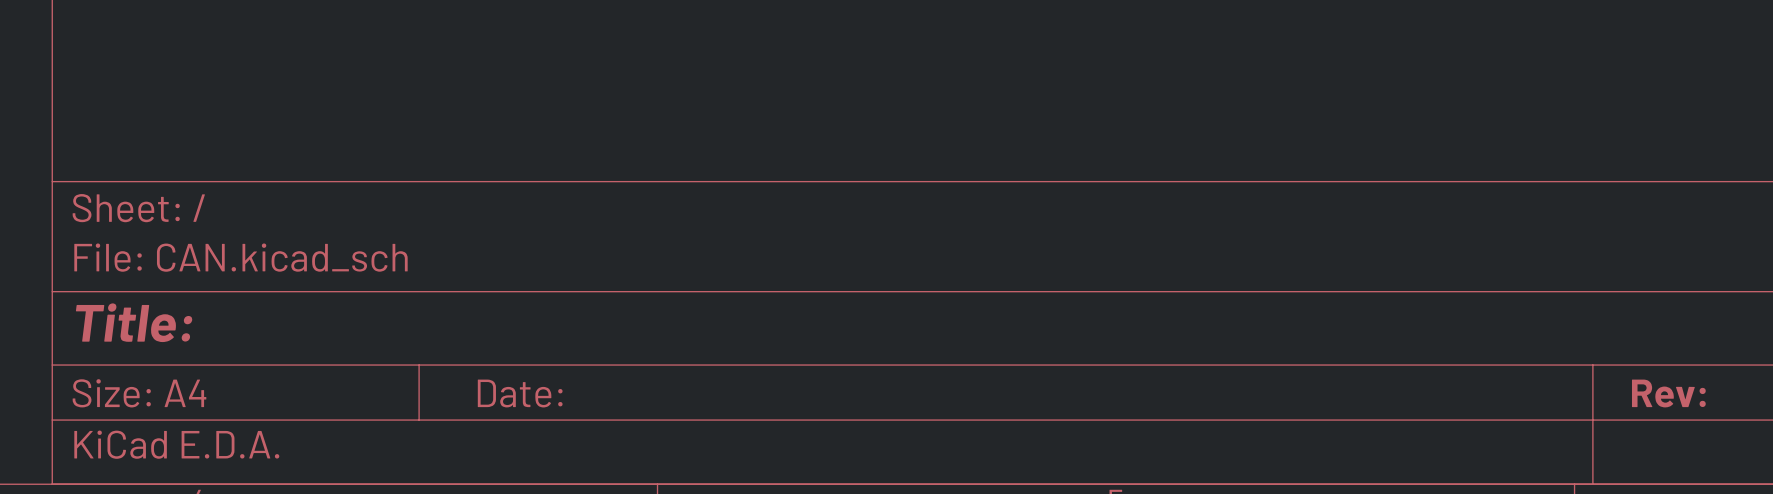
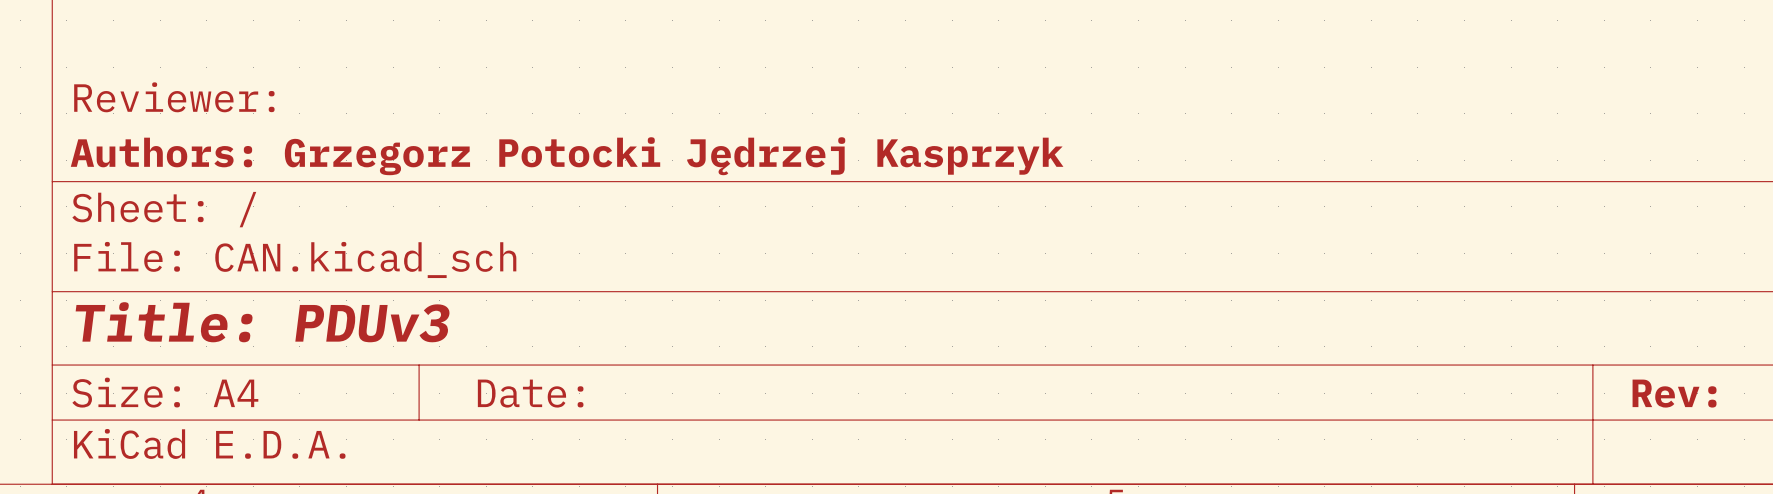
title block: none -> Reviewer: (174, 97)
title block: none -> Authors: Grzegorz Potocki Jędrzej Kasprzyk (567, 156)
title block: Title: (134, 322) -> Title: PDUv3 (262, 322)

